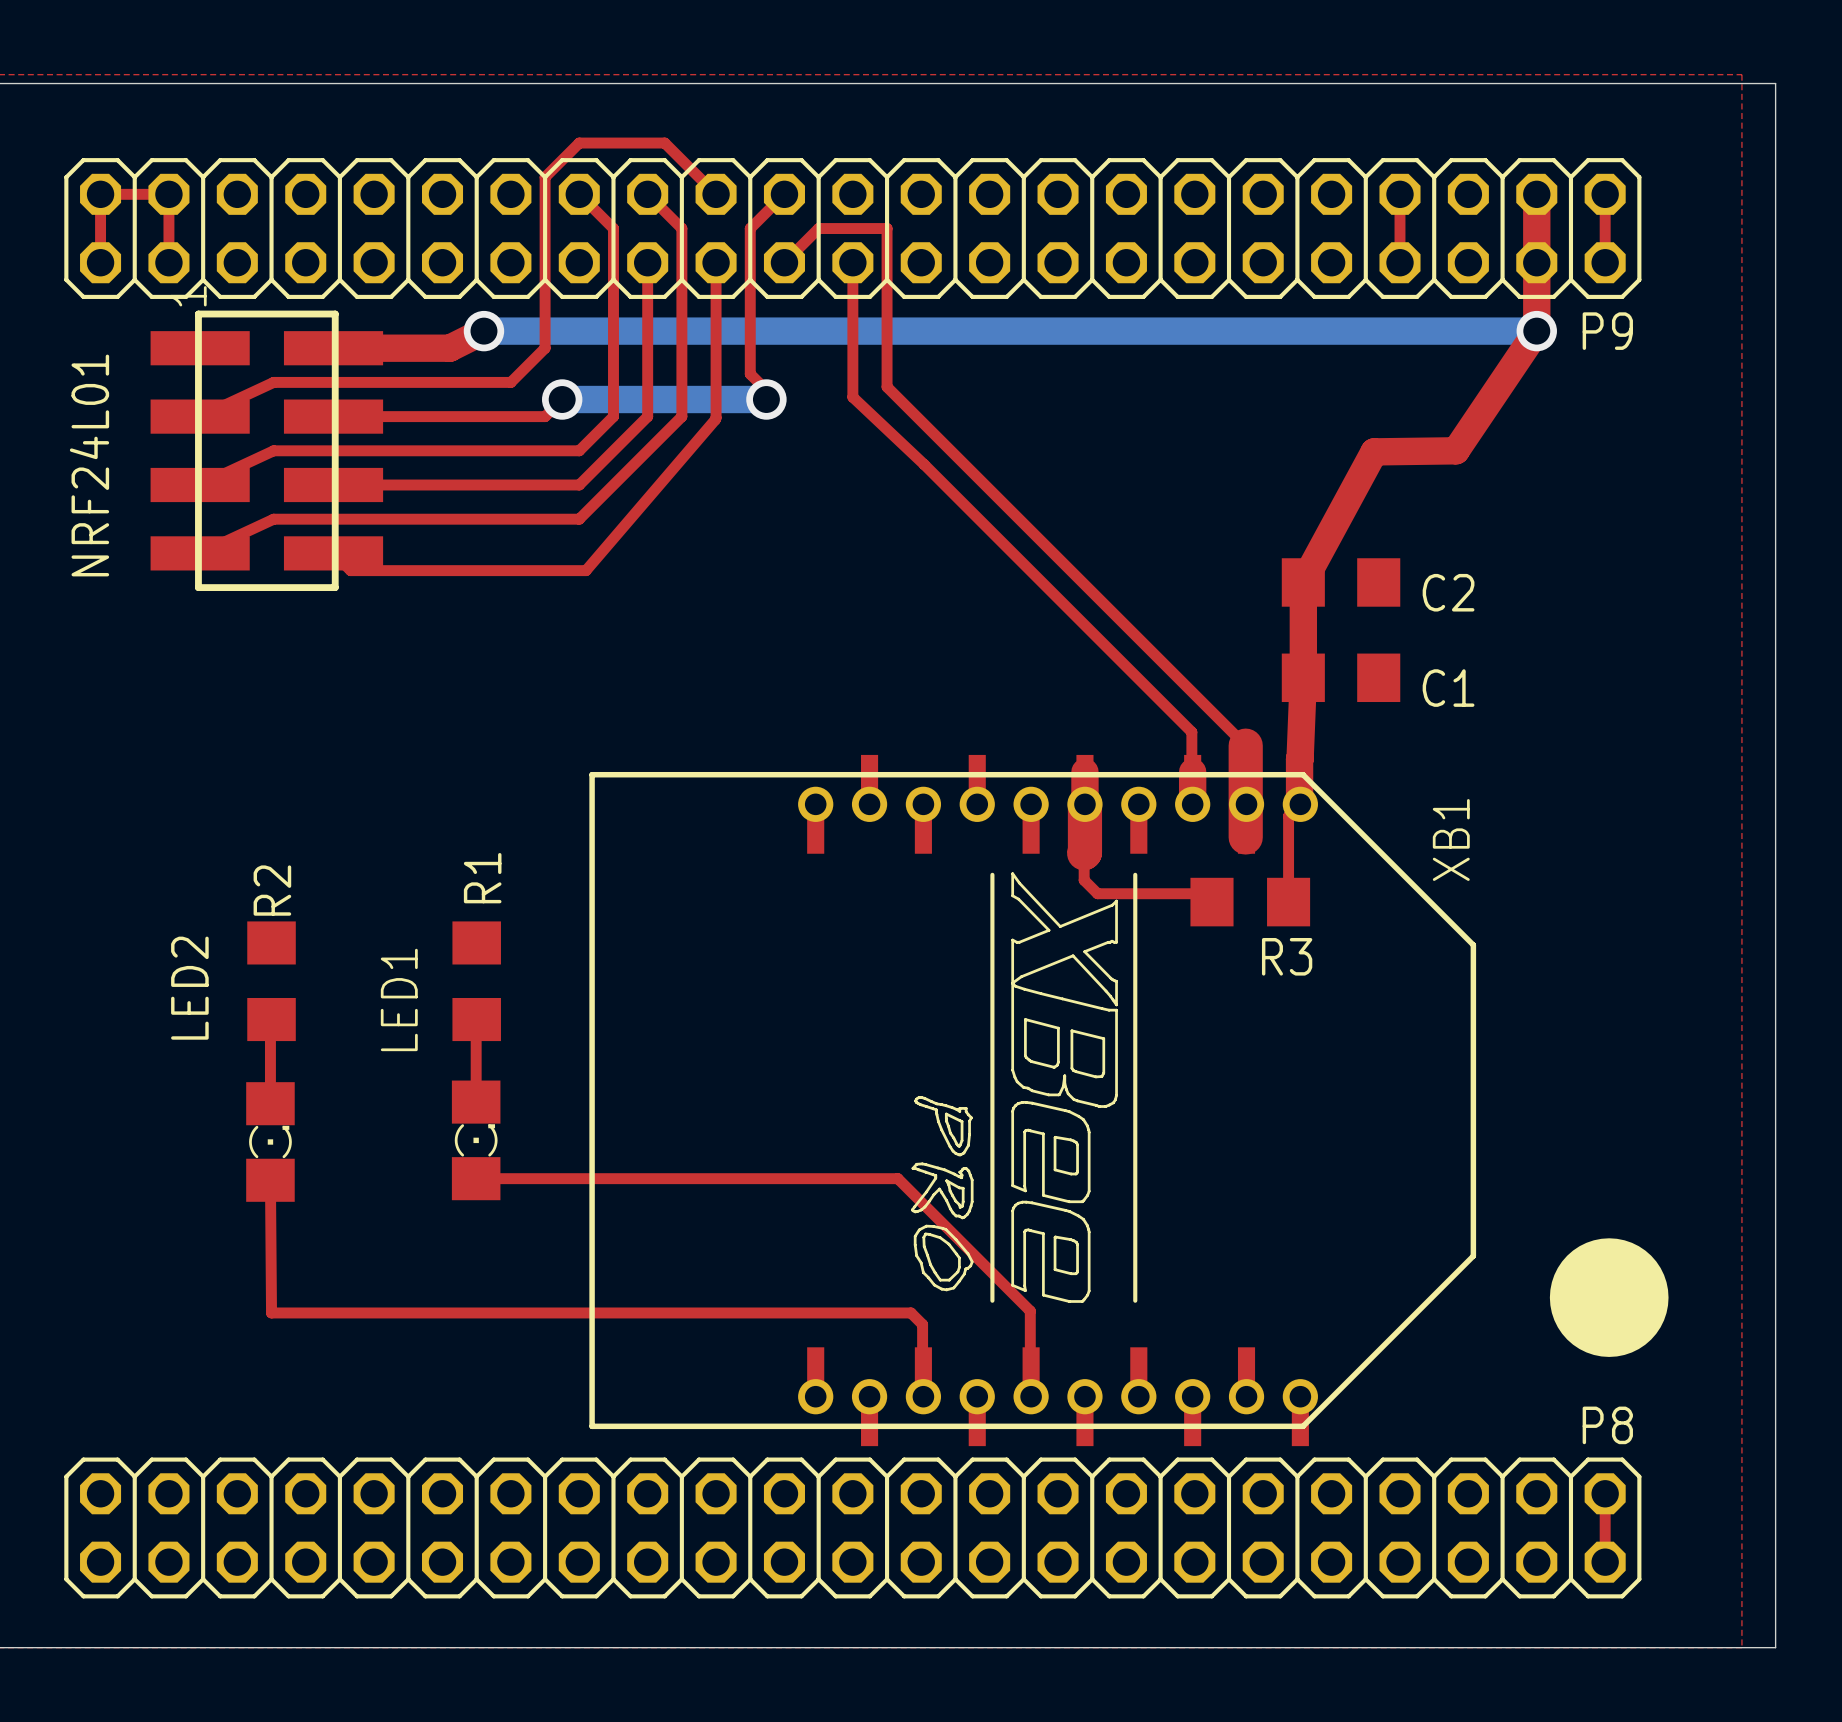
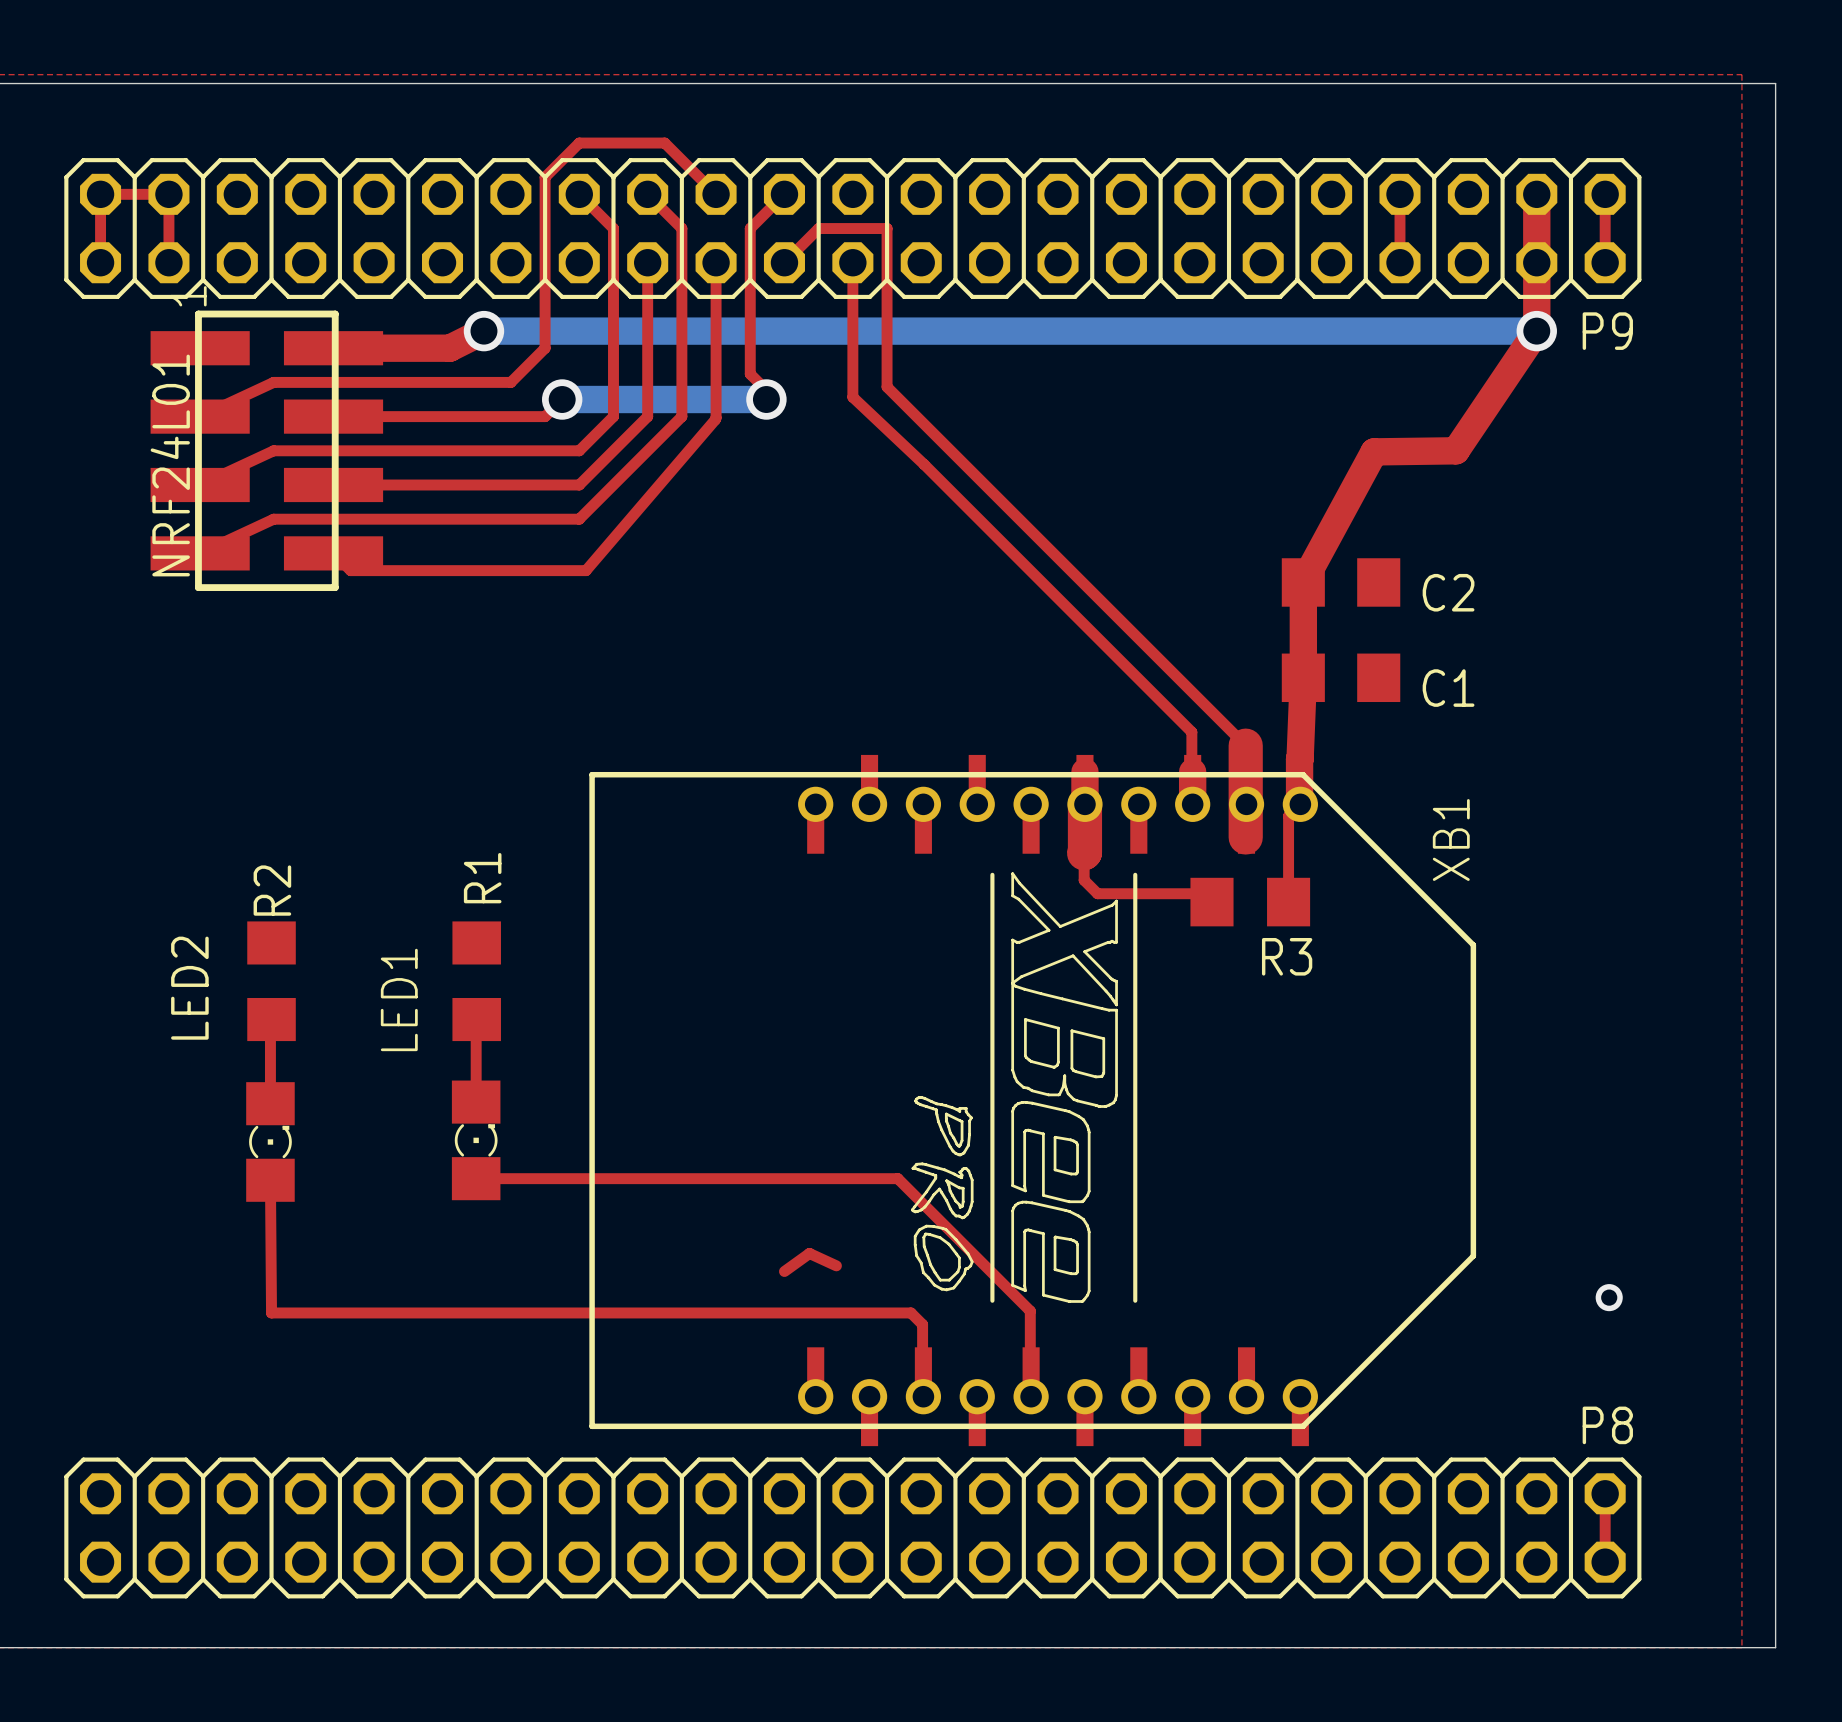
NRF24L01 name position: NRF24L01 (89, 465) -> NRF24L01 (170, 465)
drawing: [1549, 1238, 1669, 1357] -> none
top track: none -> (836, 1265) (809, 1253) (784, 1271)

